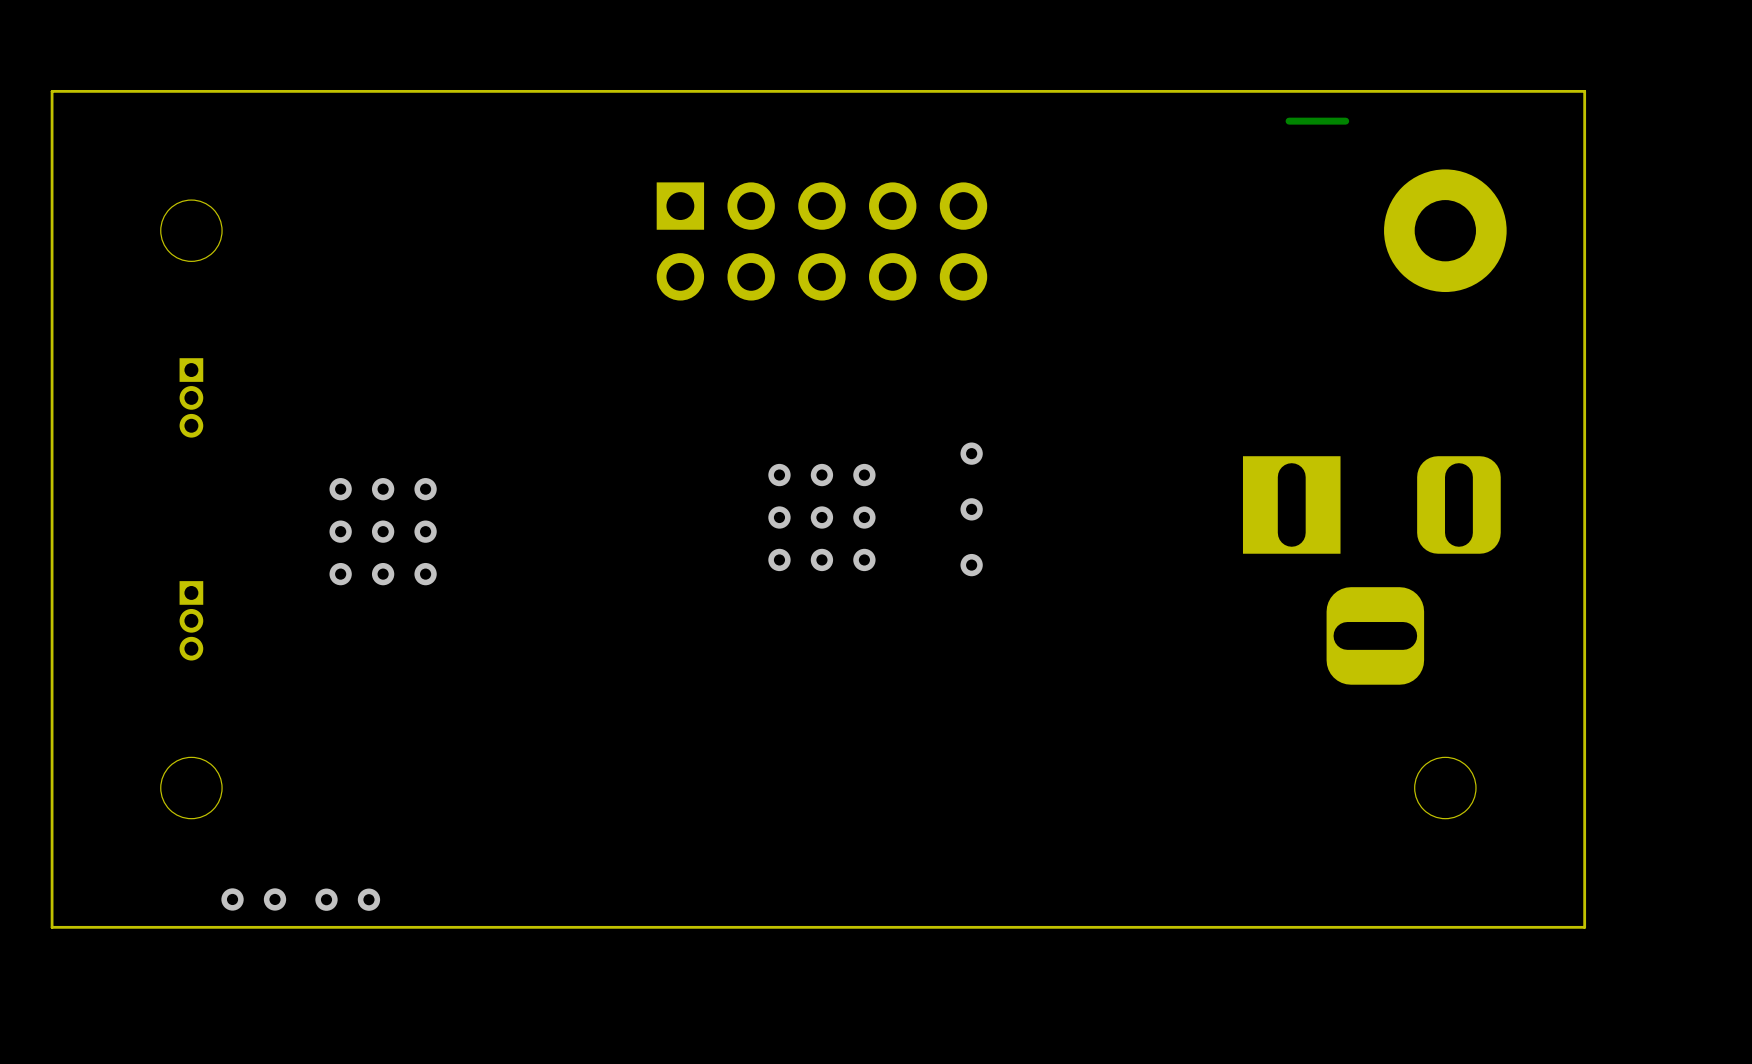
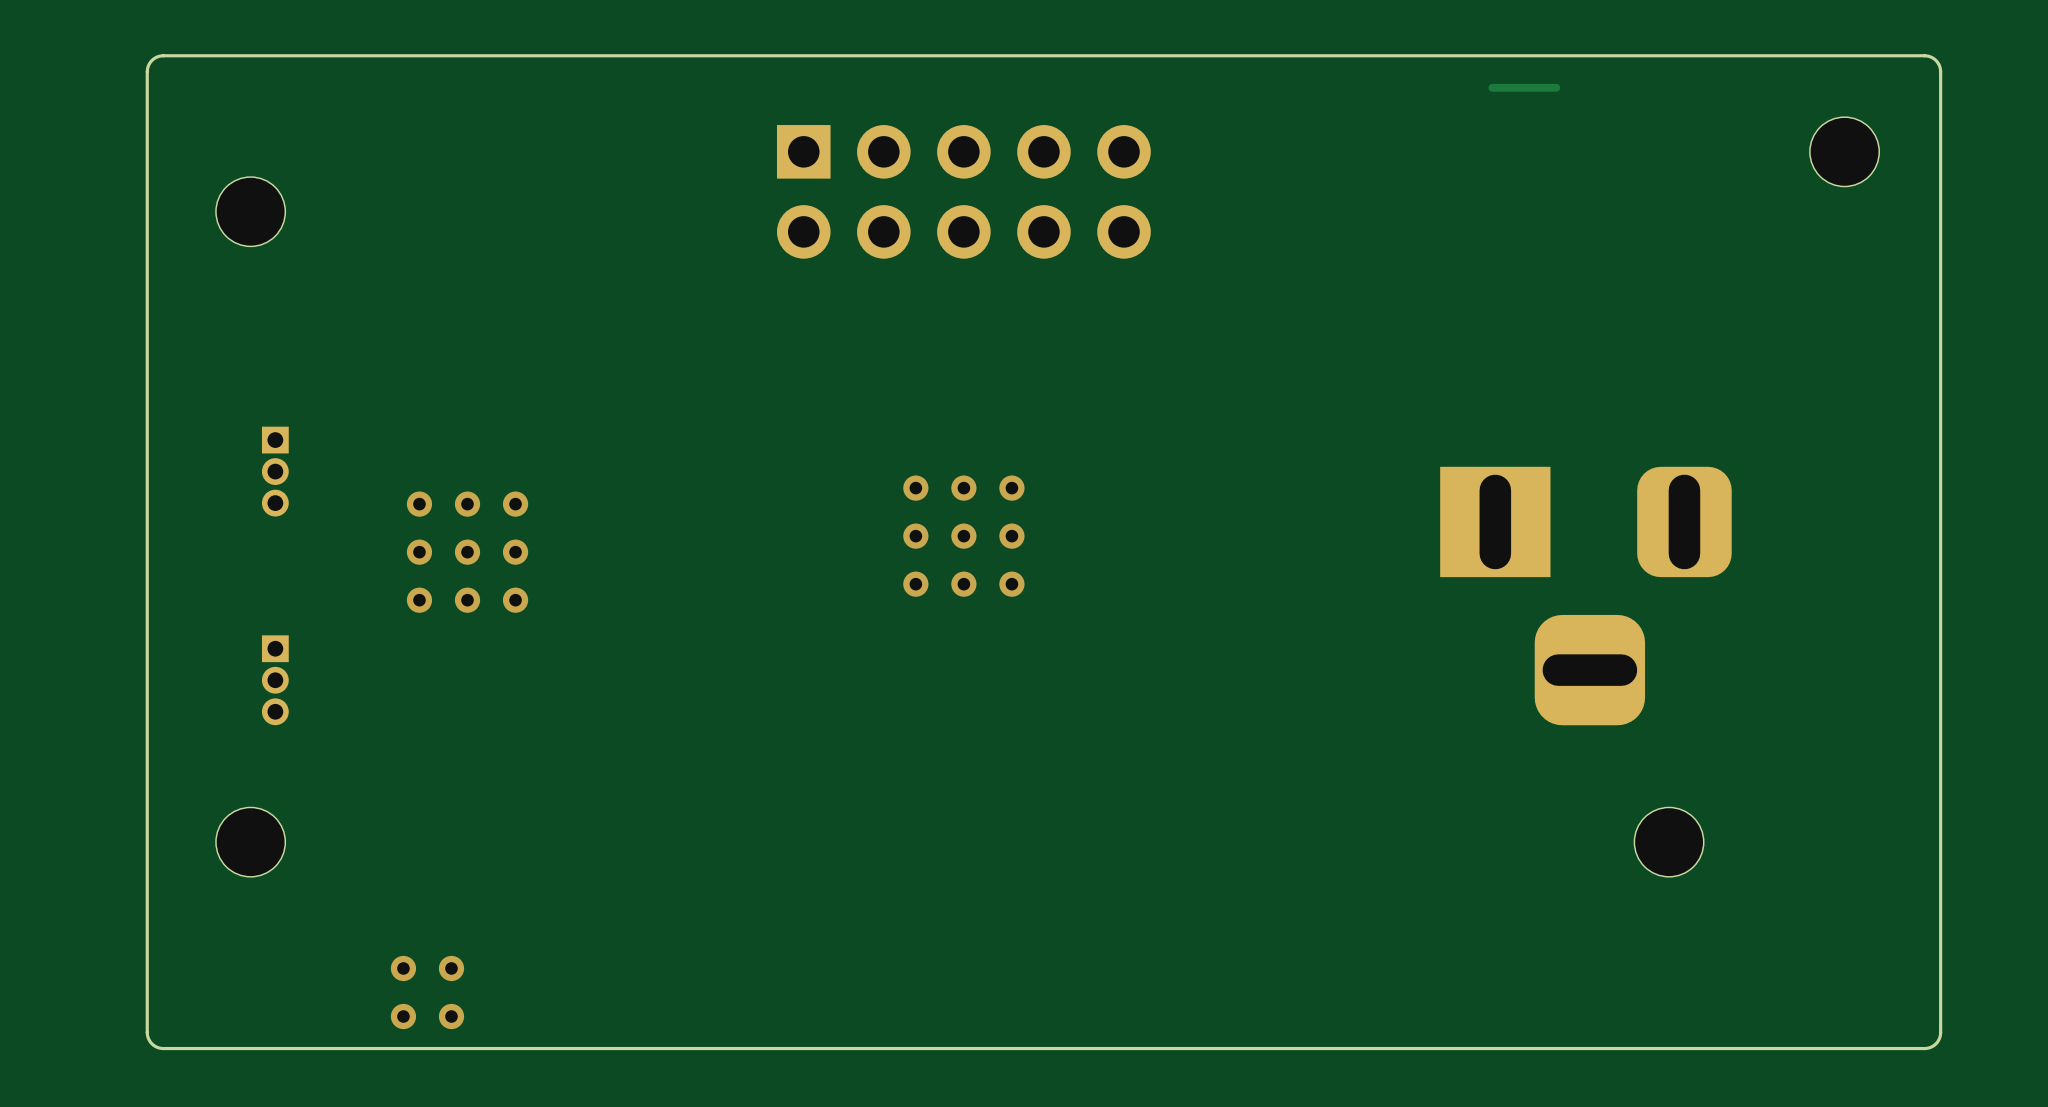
board edge: (1584, 91) (52, 91) (52, 927) (1584, 927) (1584, 91) -> (1924, 55) (1935, 60) (1940, 71) (1940, 1032) (1938, 1040) (1932, 1046) (1924, 1048) (163, 1048) (155, 1046) (149, 1040) (147, 1032) (147, 71) (149, 63) (155, 57) (163, 55) (1924, 55)
part: none -> (1844, 151)
part: (1445, 230) -> none
part position: (821, 241) -> (963, 191)
part position: (191, 397) -> (275, 471)
via: (971, 453) -> none
via: (971, 509) -> none
via: (971, 565) -> none
part position: (191, 620) -> (275, 680)
via: (232, 899) -> none
via: (275, 899) -> none
via: none -> (403, 1016)
via: none -> (451, 1016)

